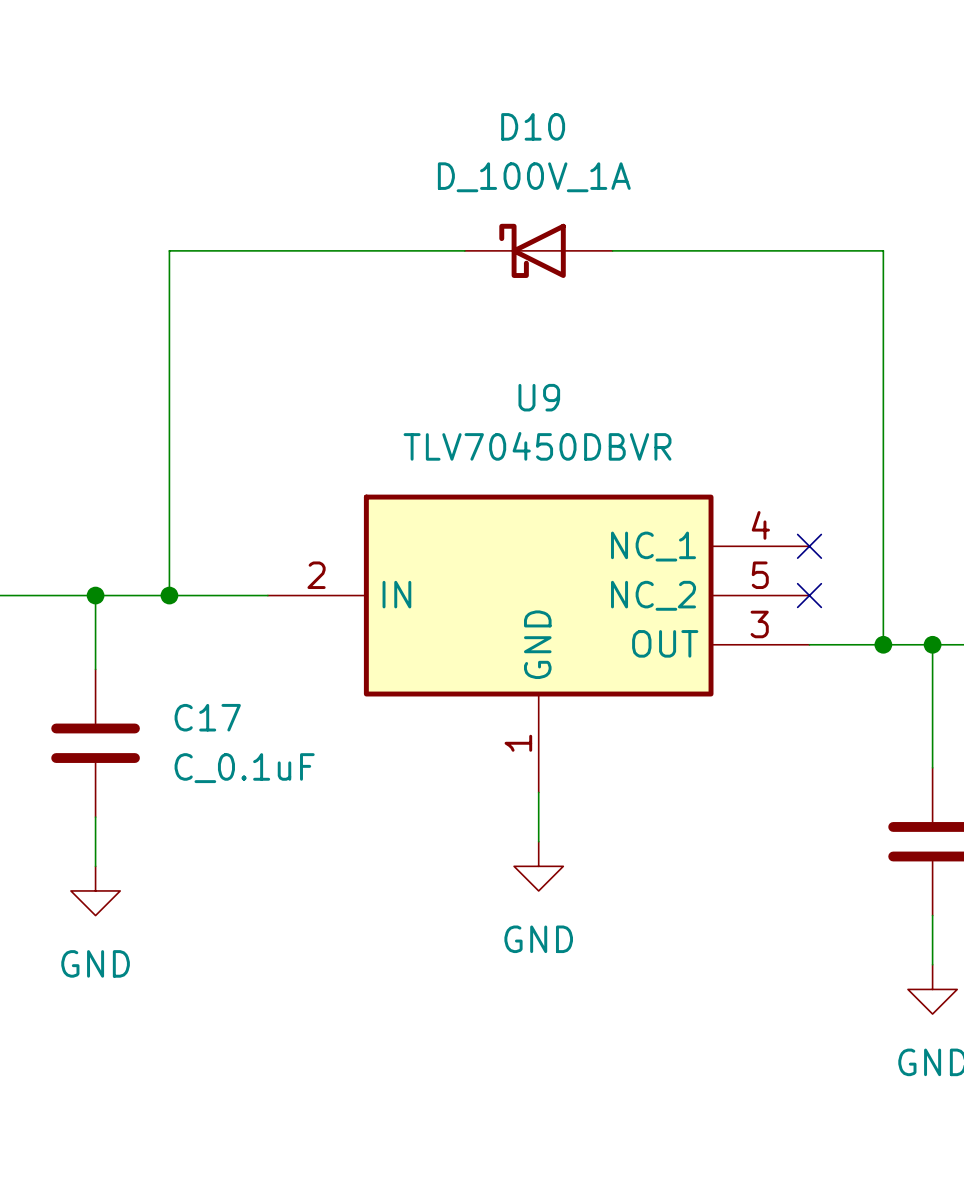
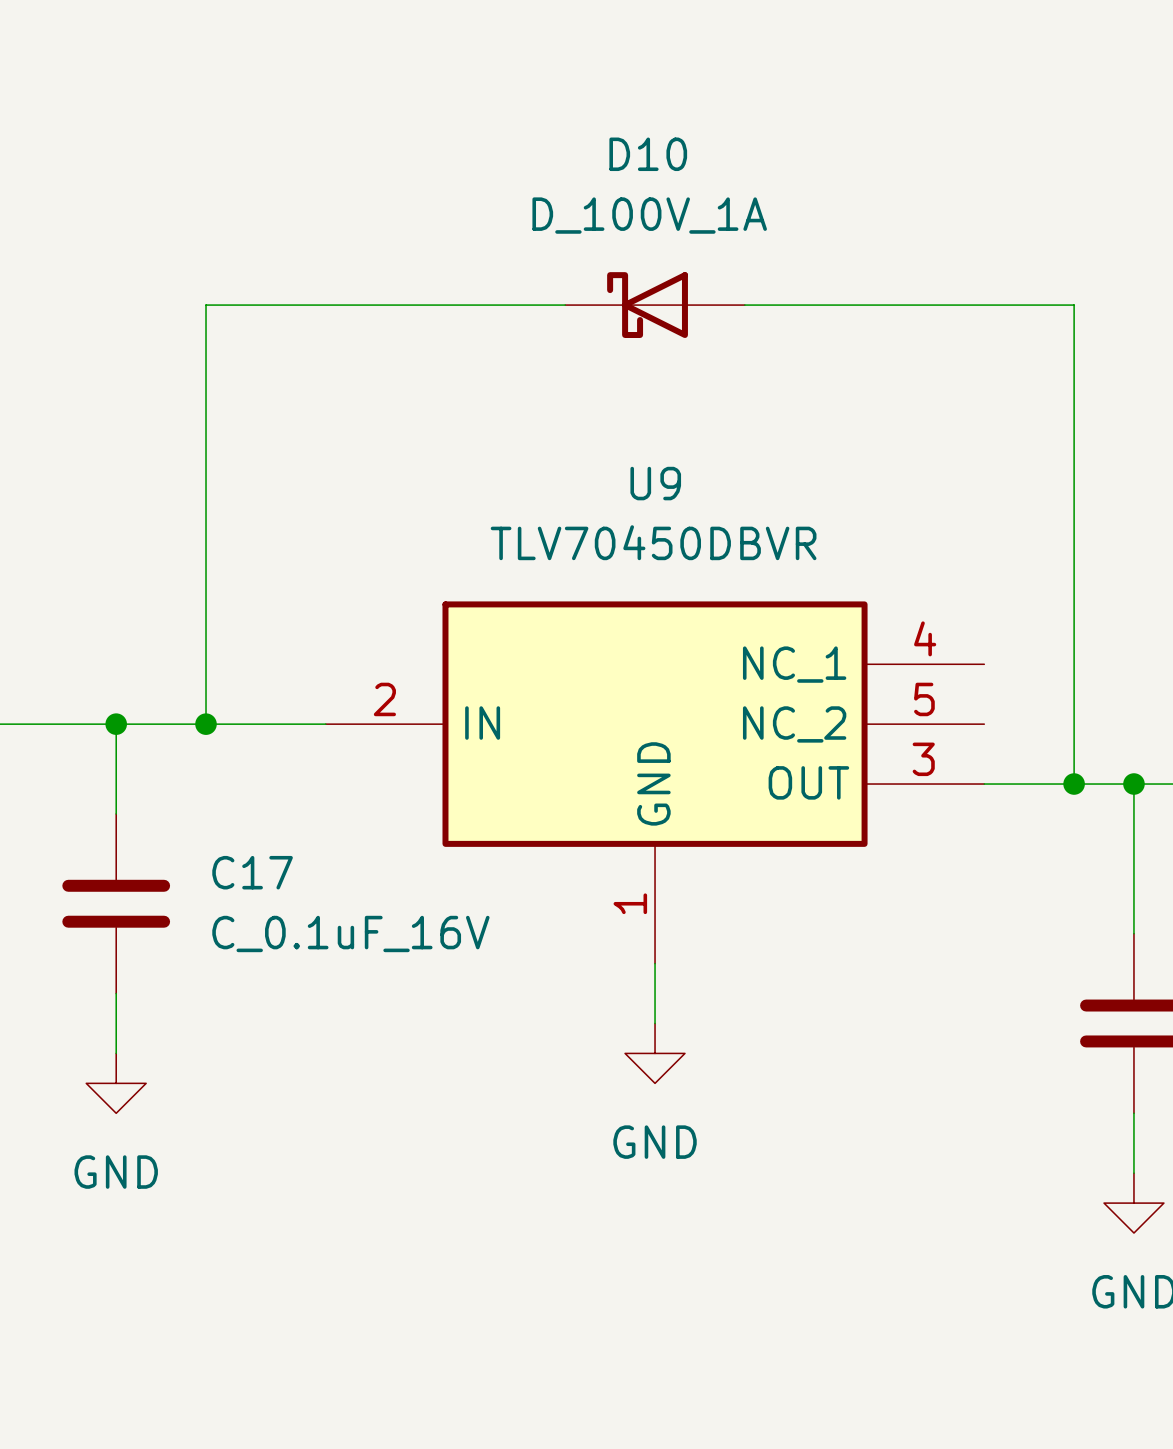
no-connect mark: (809, 546) -> none
no-connect mark: (809, 595) -> none
C17 value: C_0.1uF (244, 768) -> C_0.1uF_16V (350, 933)

